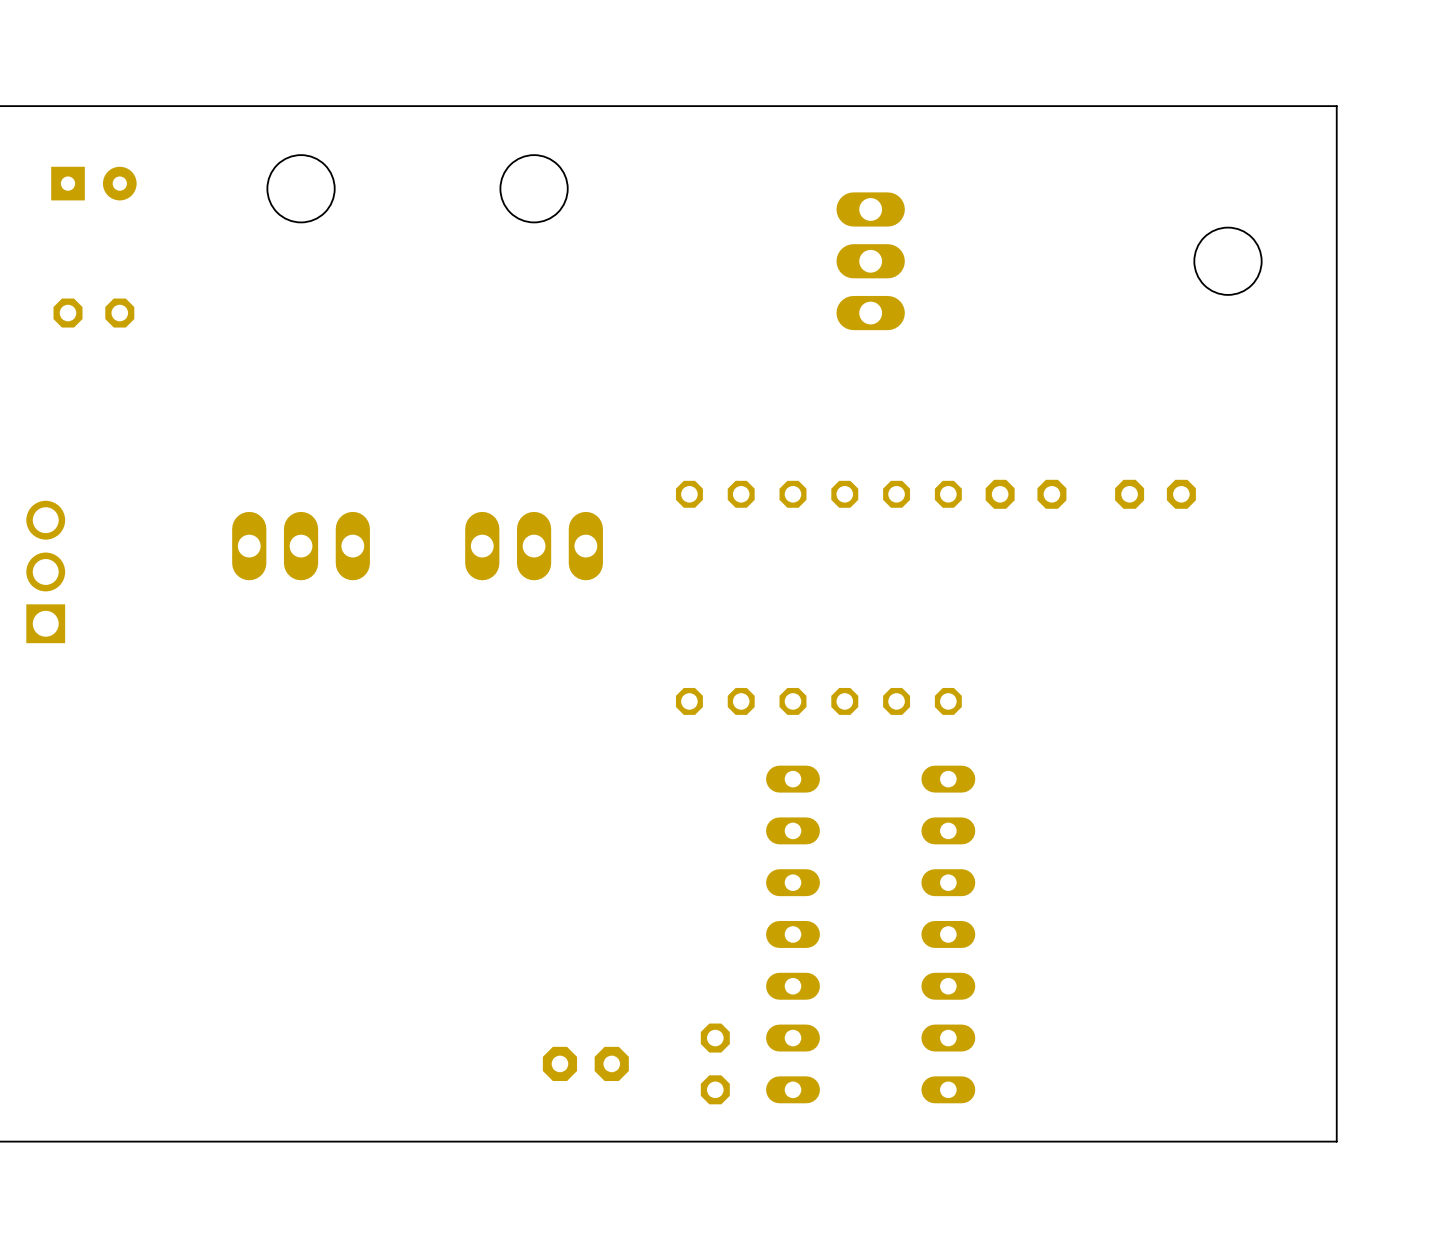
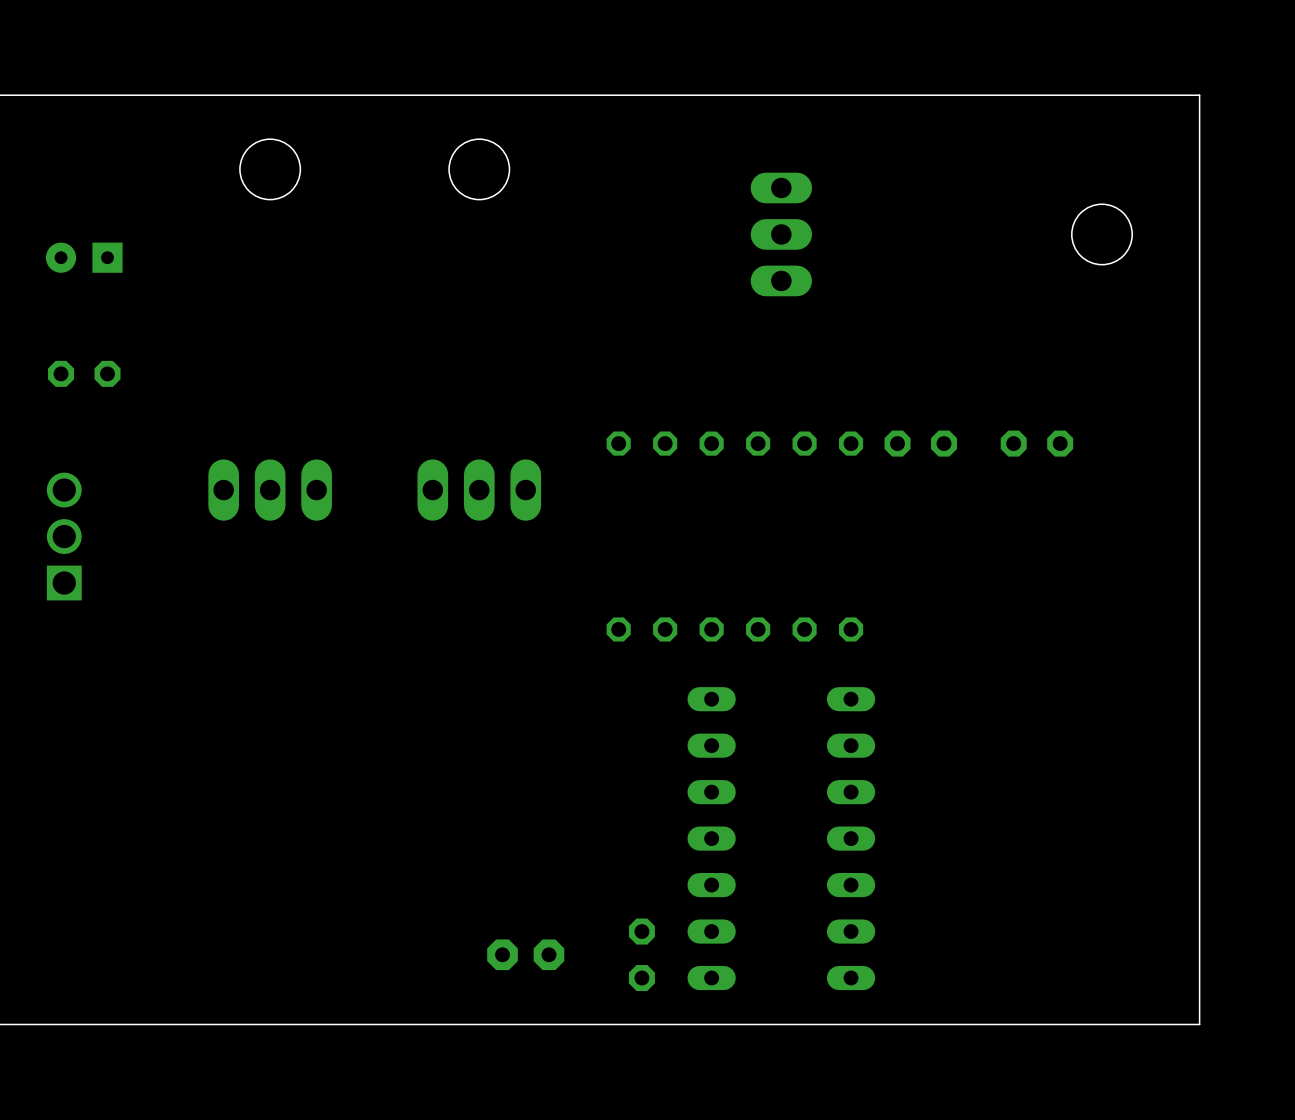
part rotation: 0° (93, 183) -> 180° (84, 257)
part position: (93, 183) -> (84, 257)
part position: (93, 313) -> (84, 373)
part position: (45, 571) -> (64, 536)

